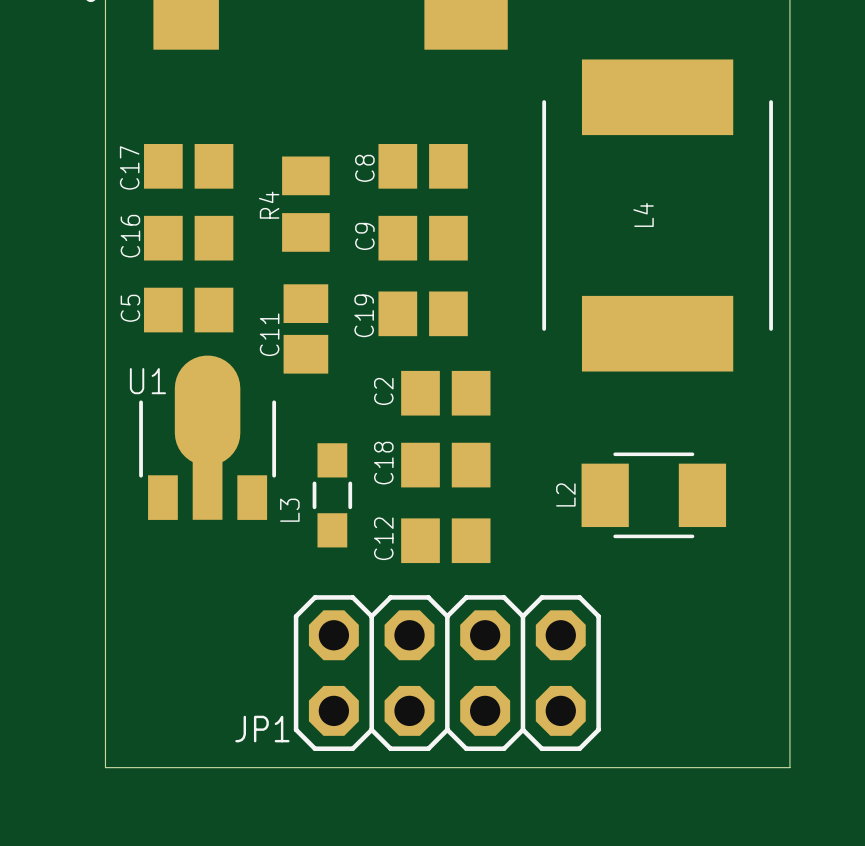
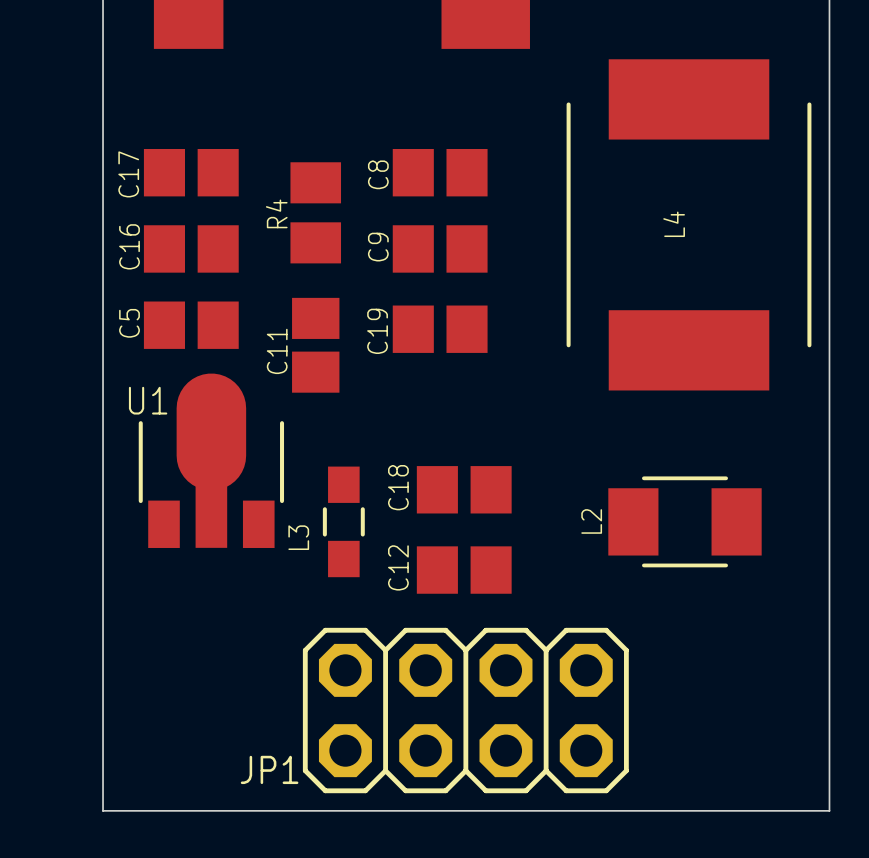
C2: (445, 393) -> none

